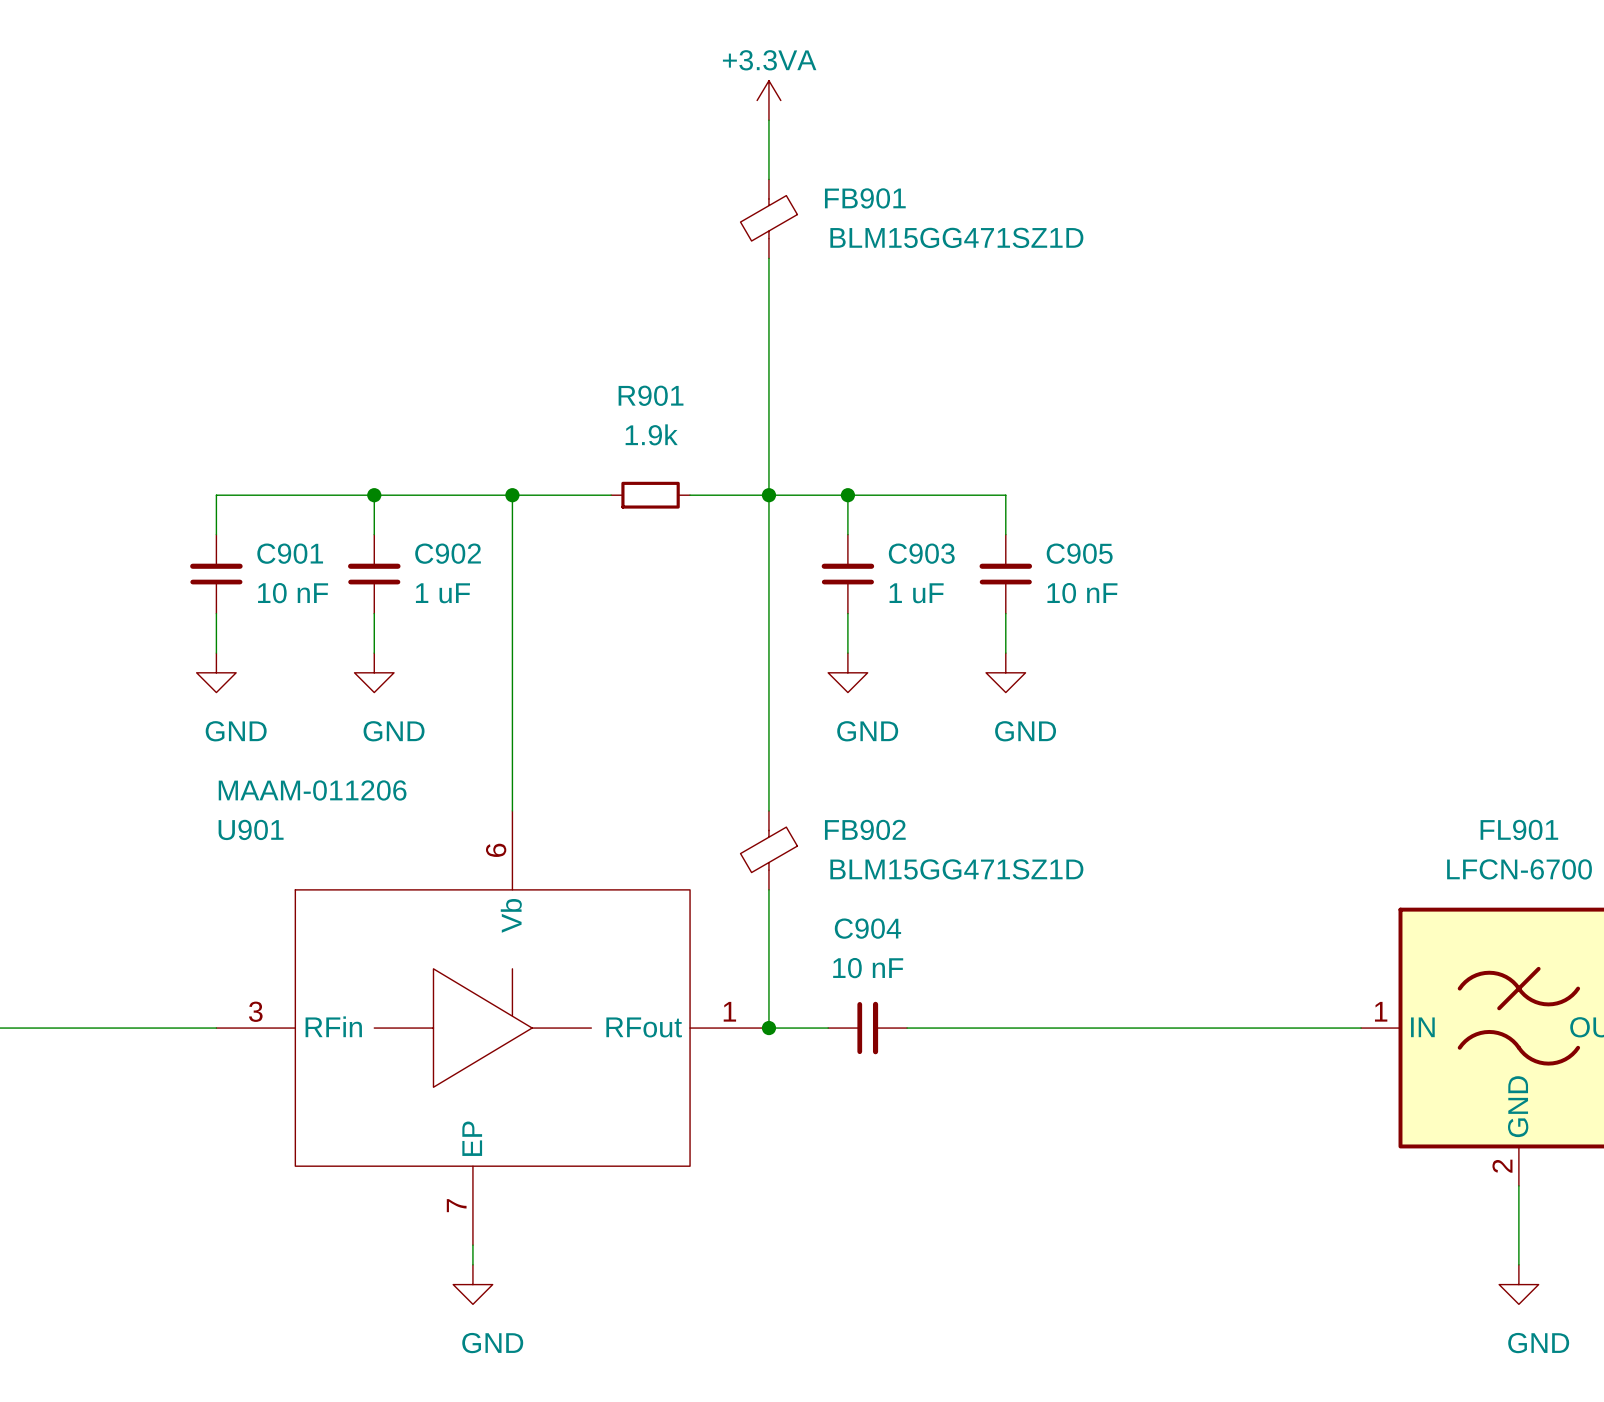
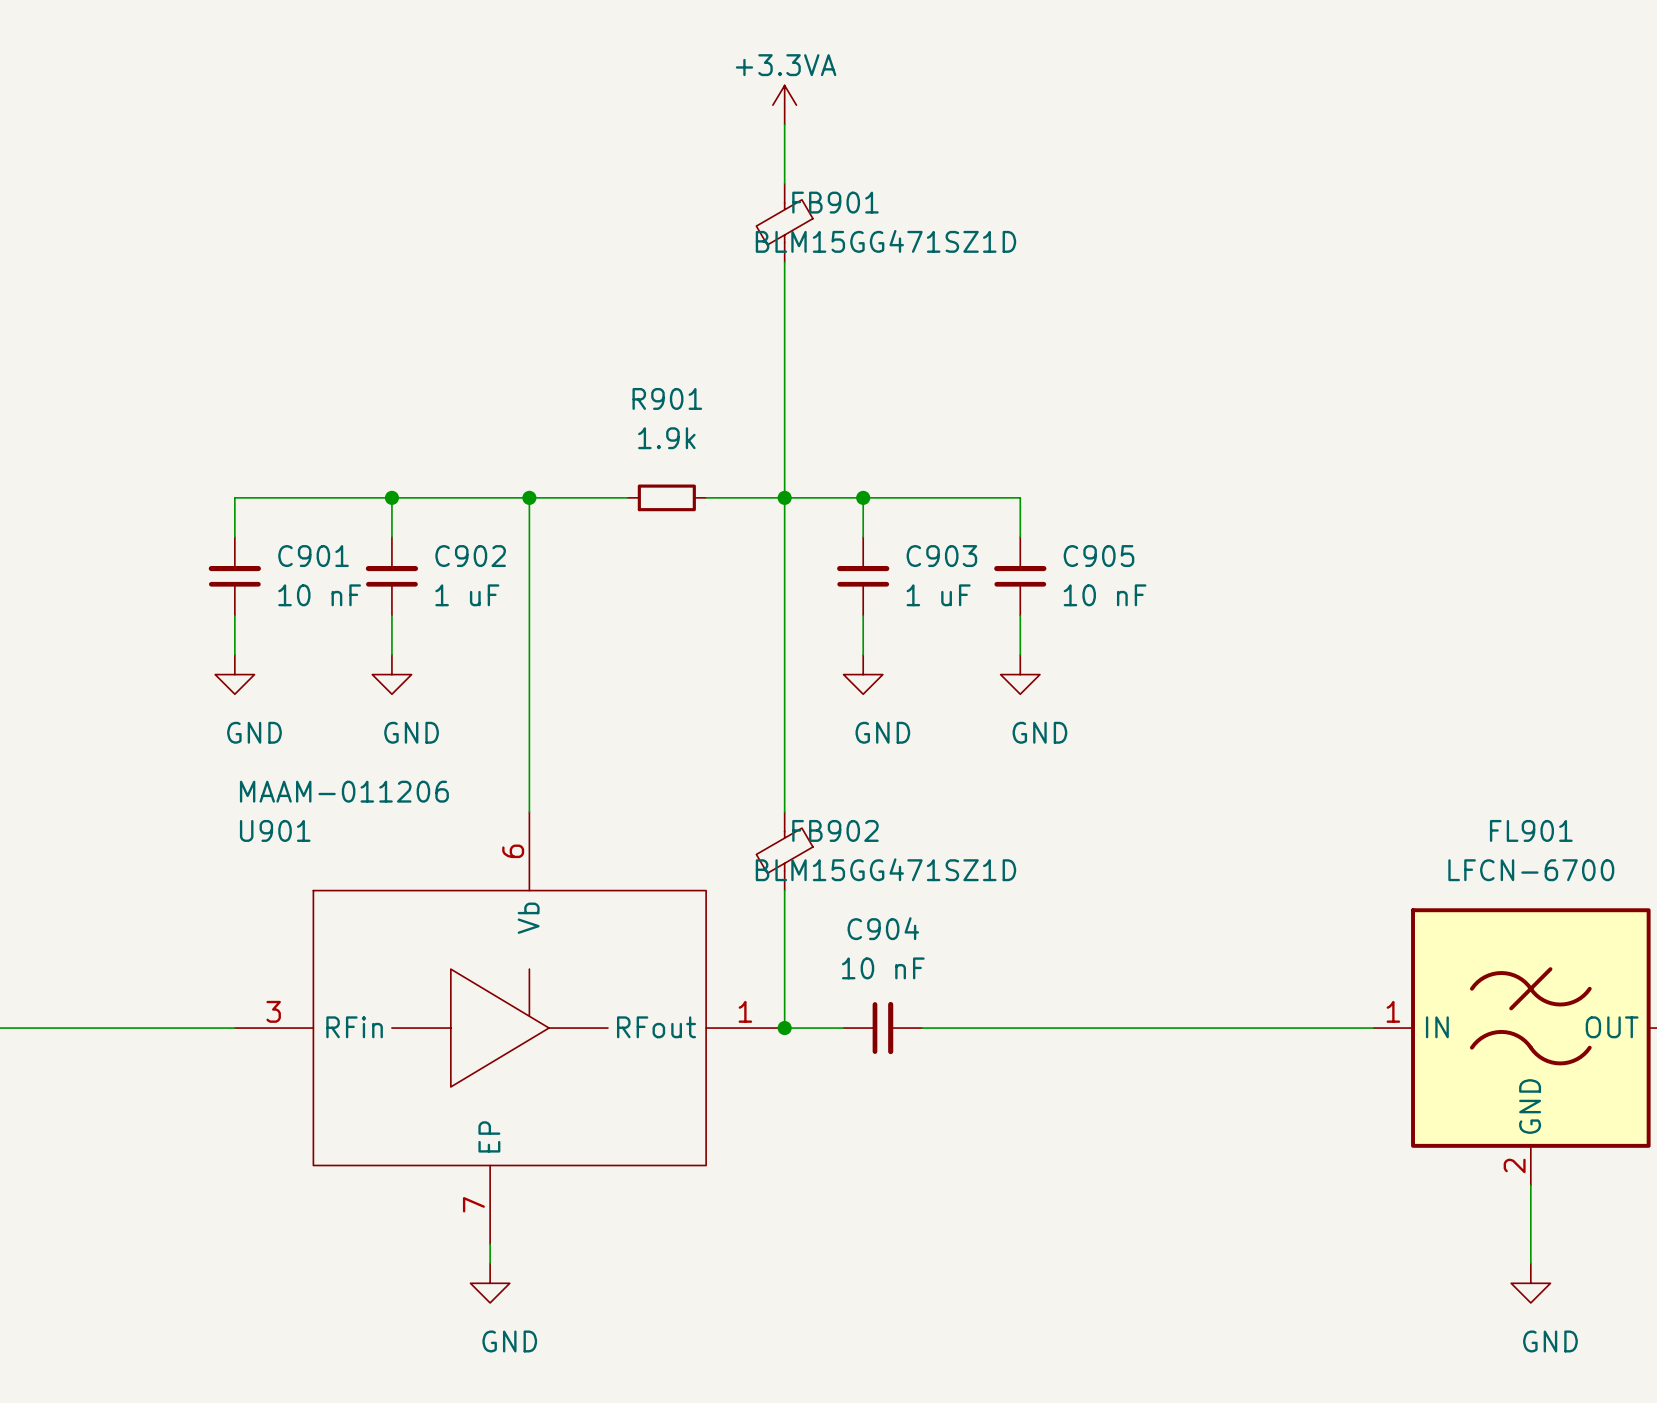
FB901 name position: FB901 (865, 198) -> FB901 (835, 202)
FB901 value position: BLM15GG471SZ1D (956, 237) -> BLM15GG471SZ1D (885, 241)
FB902 name position: FB902 (865, 829) -> FB902 (835, 830)
FB902 value position: BLM15GG471SZ1D (956, 869) -> BLM15GG471SZ1D (885, 869)

